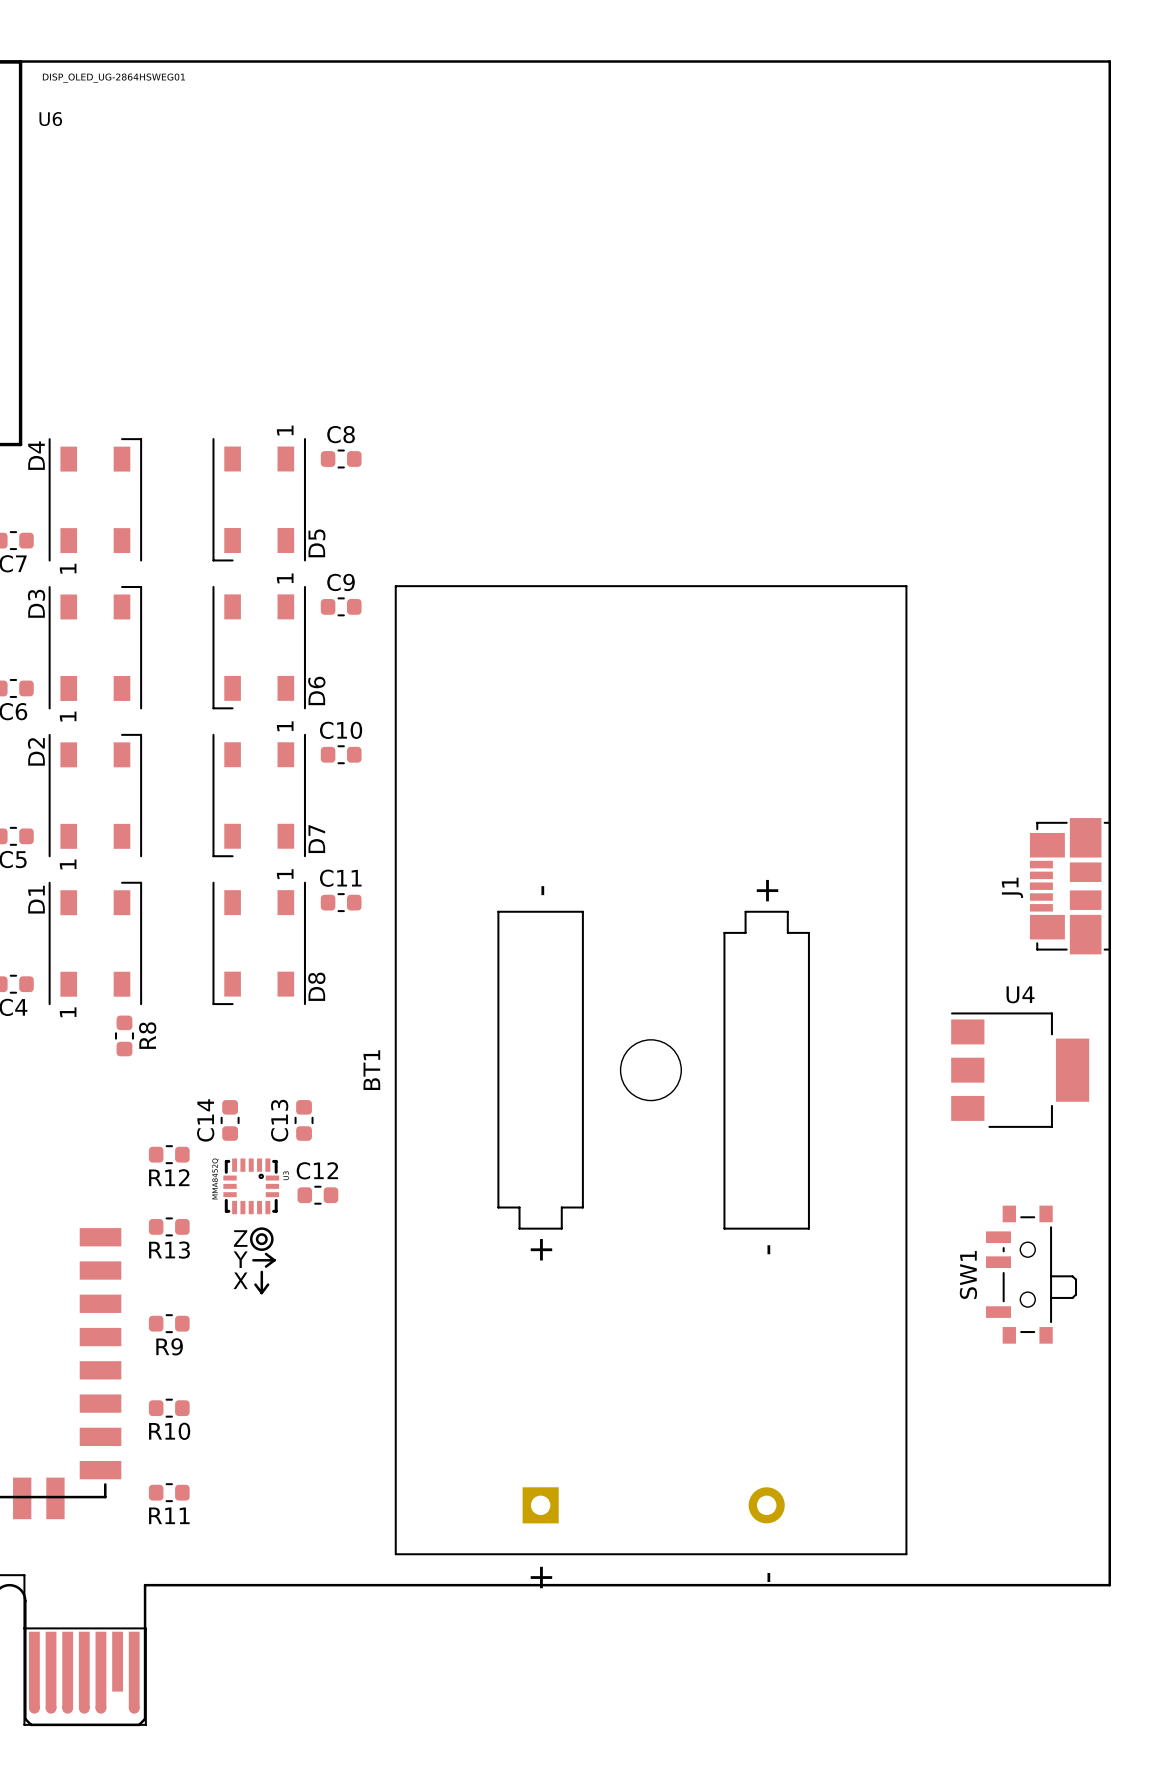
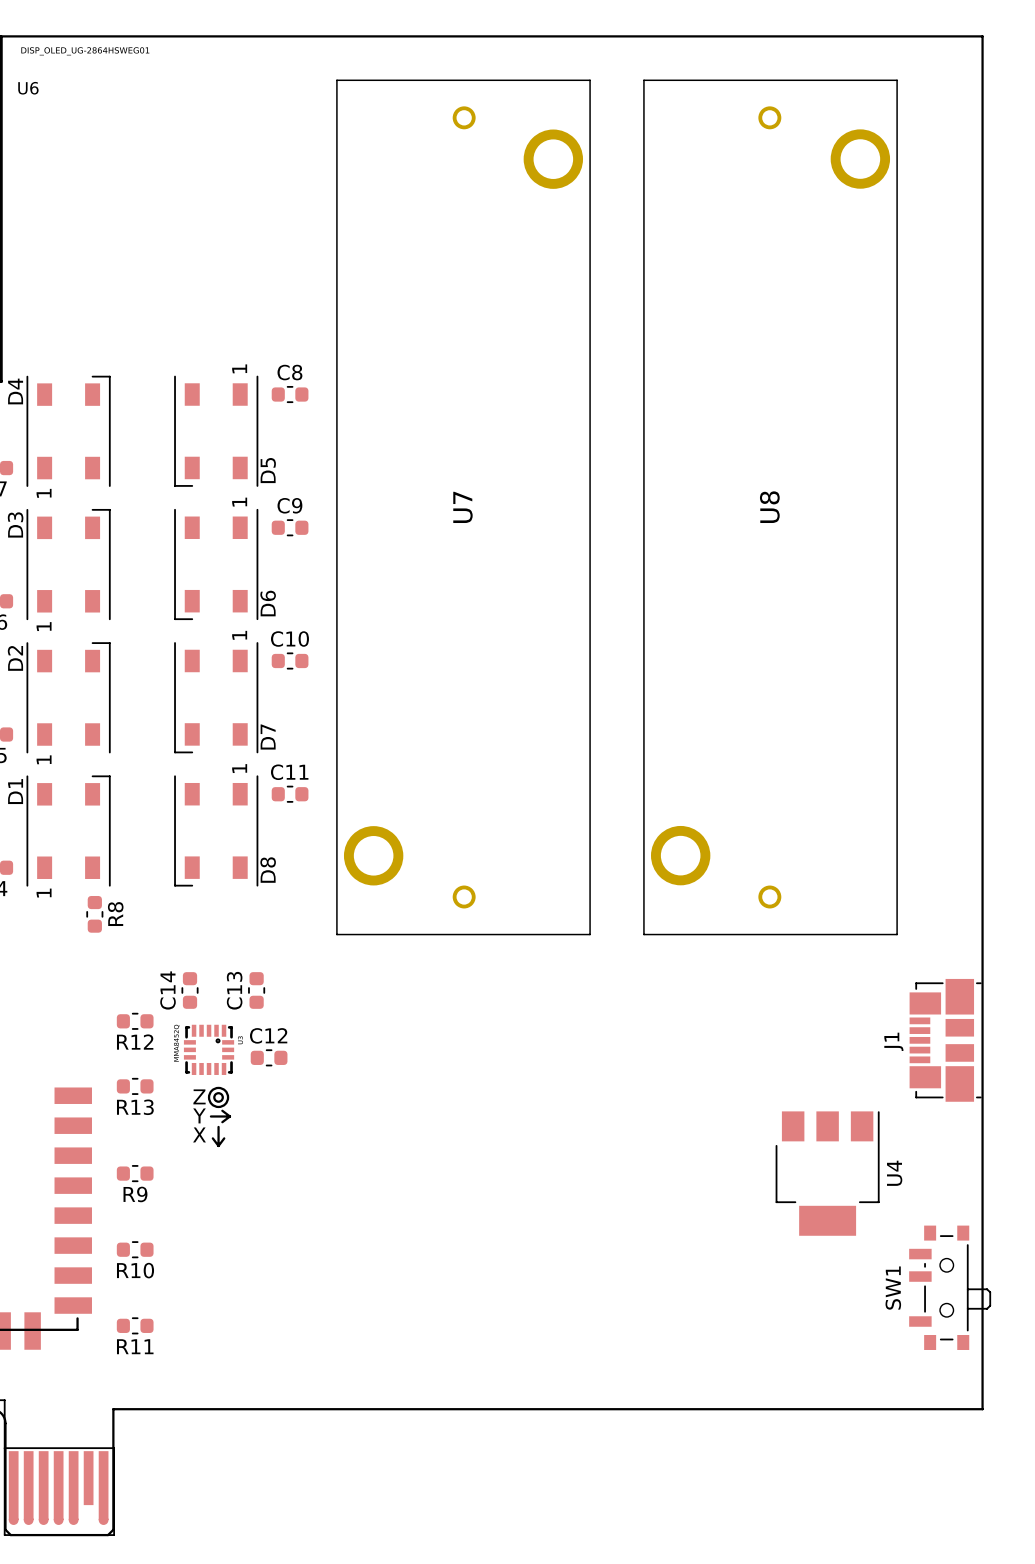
U7: none -> (463, 507)
U8: none -> (770, 507)
J1 position: (1069, 886) -> (945, 1040)
BT1: (651, 1070) -> none
U4 rotation: 0° (1020, 1070) -> 90° clockwise (827, 1173)
U4 position: (1020, 1070) -> (827, 1173)
SW1 position: (1031, 1274) -> (950, 1287)

